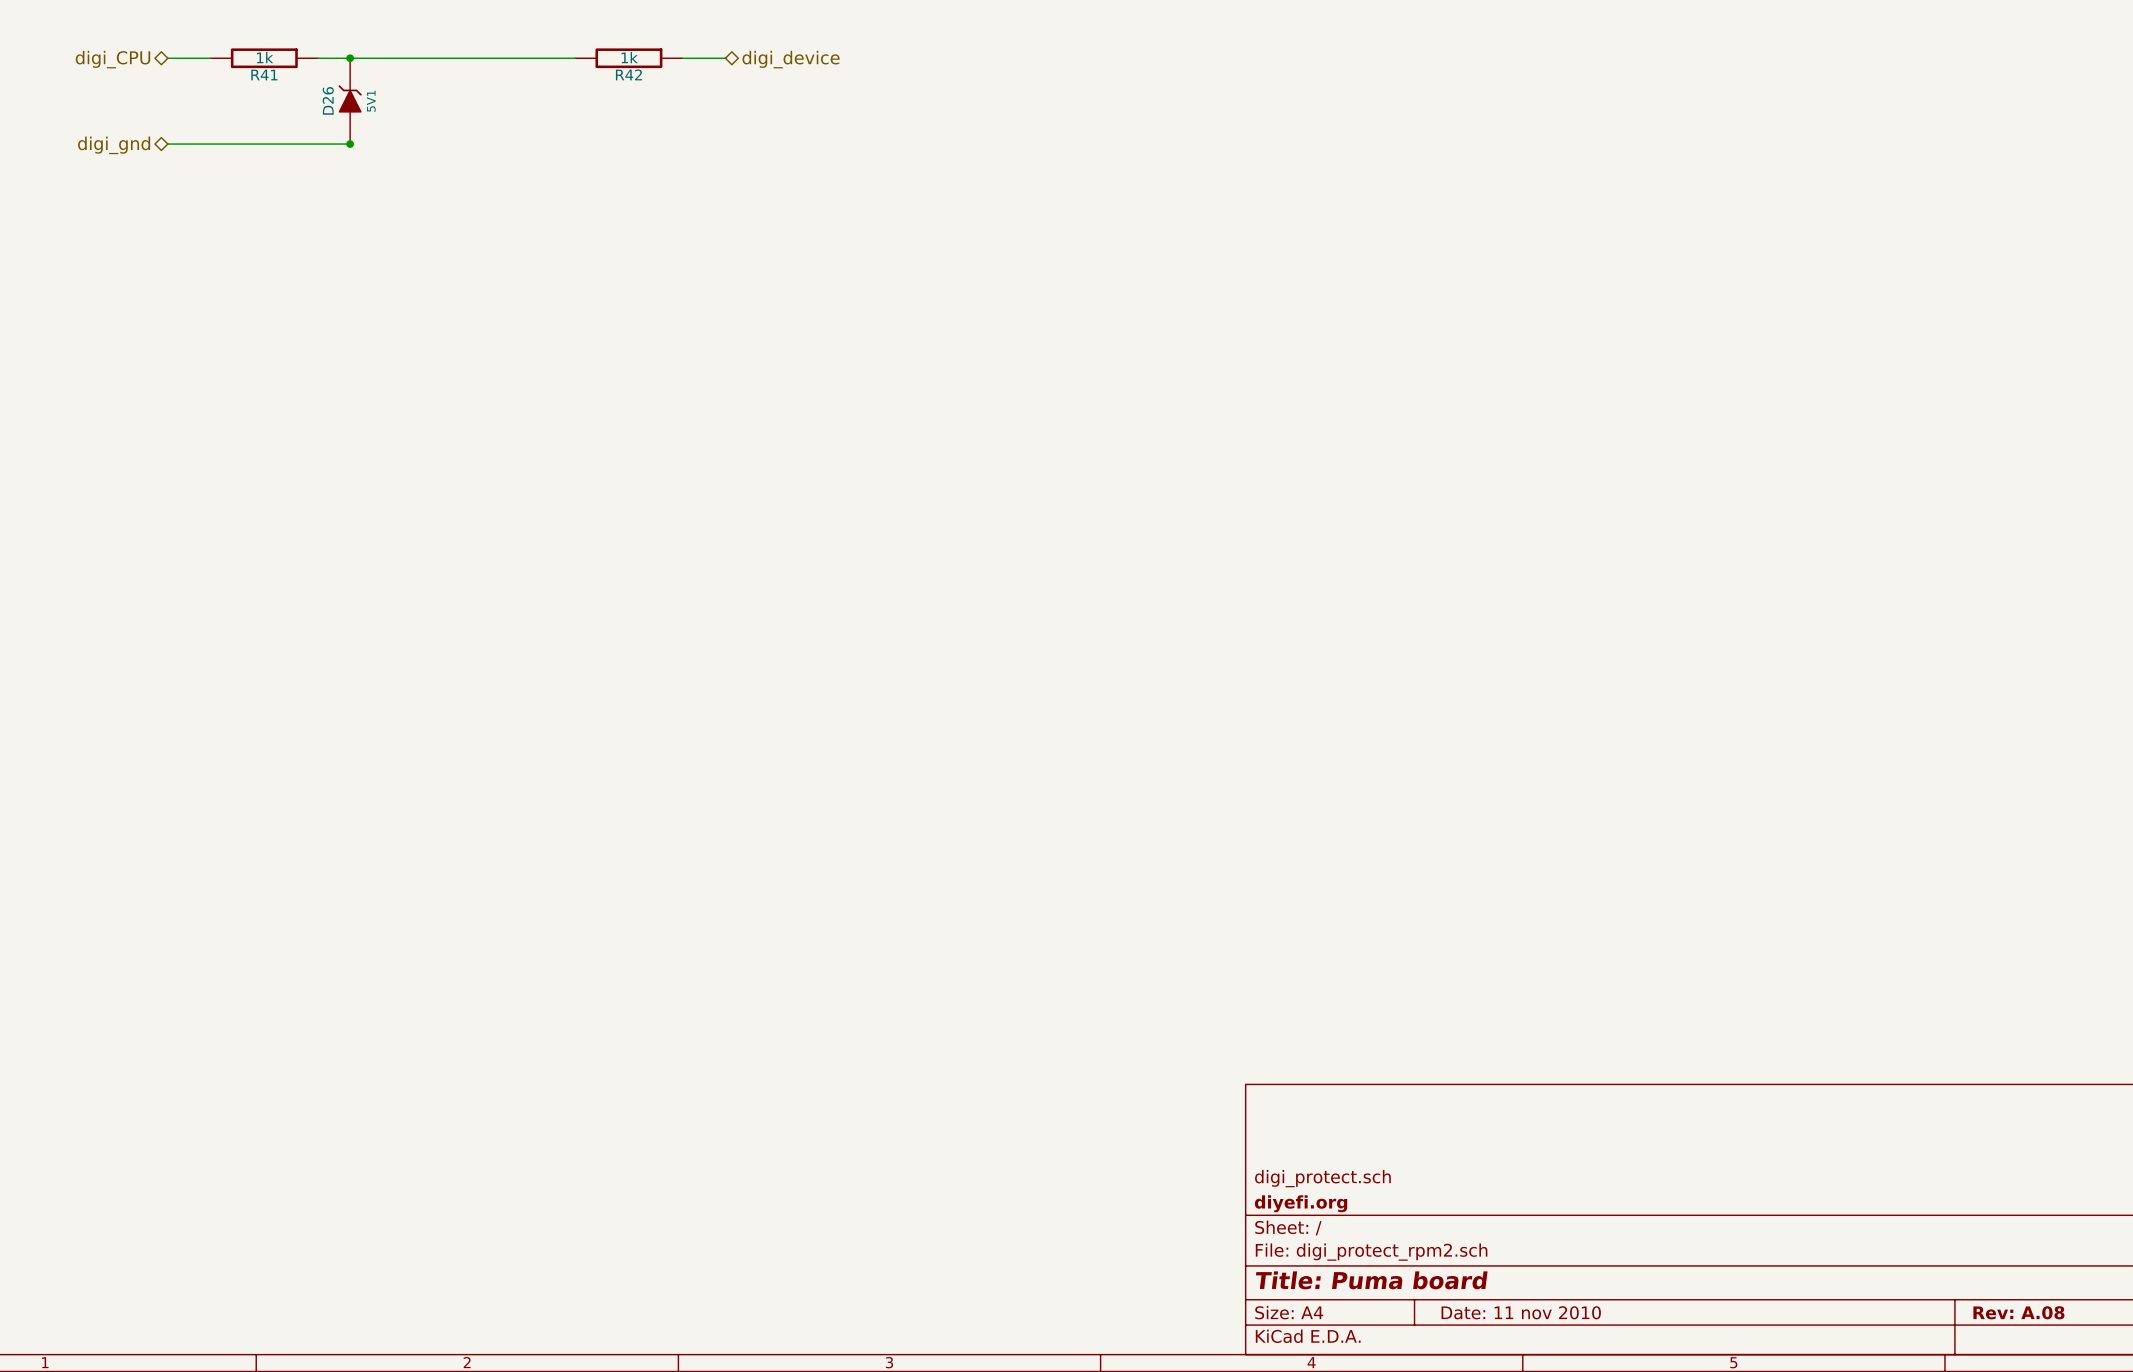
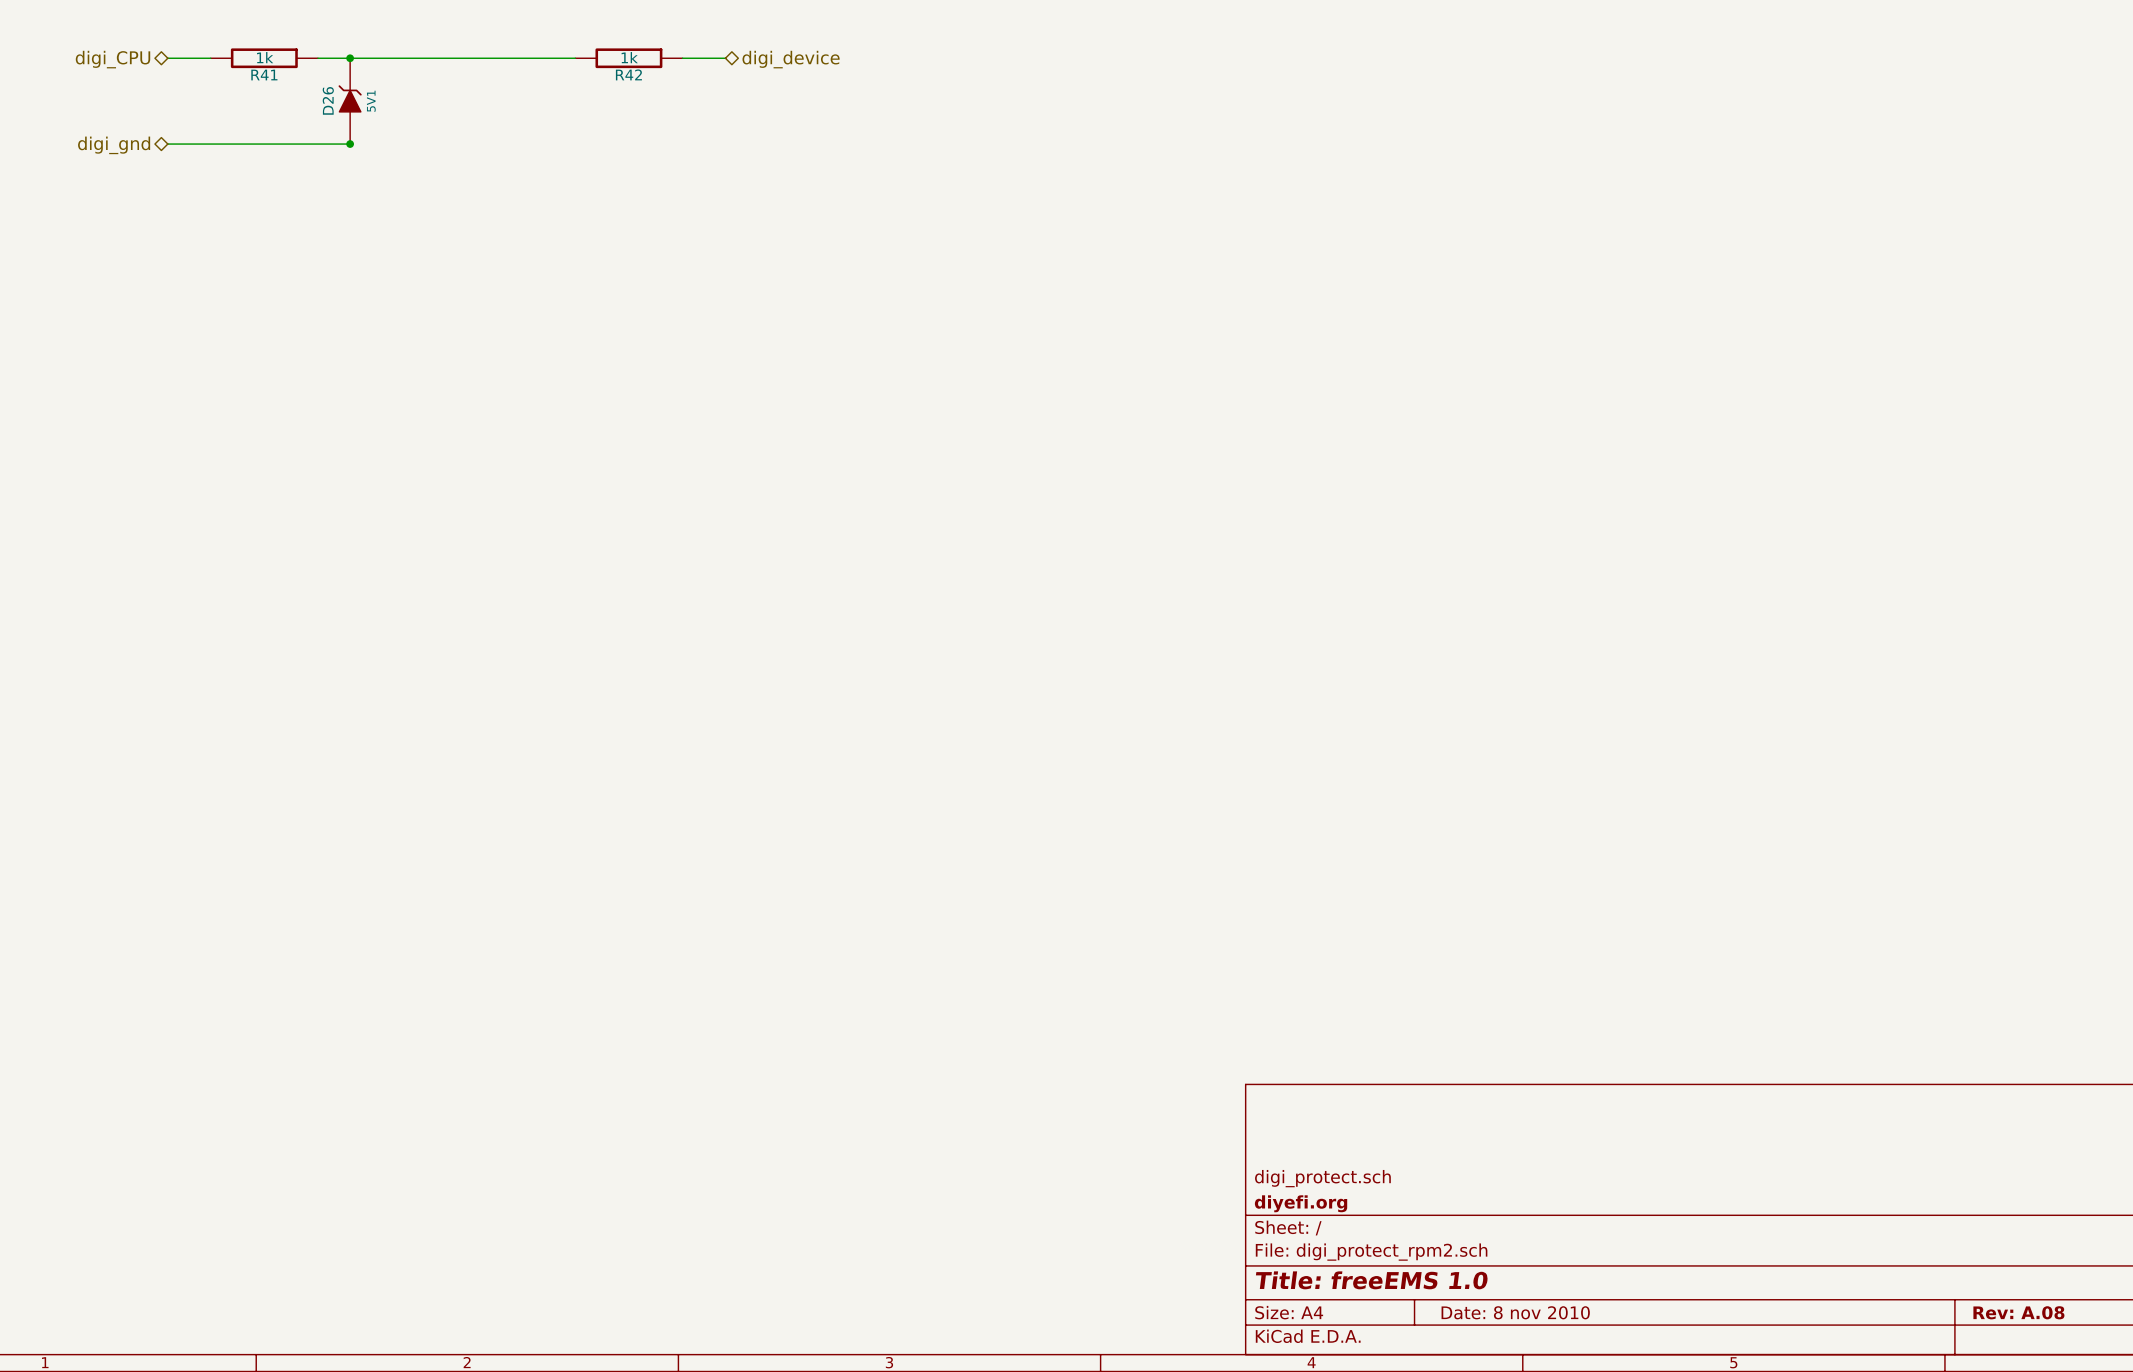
title block: Title: Puma board (1371, 1280) -> Title: freeEMS 1.0 (1371, 1280)
title block: Date: 11 nov 2010 (1521, 1312) -> Date: 8 nov 2010 (1515, 1312)

